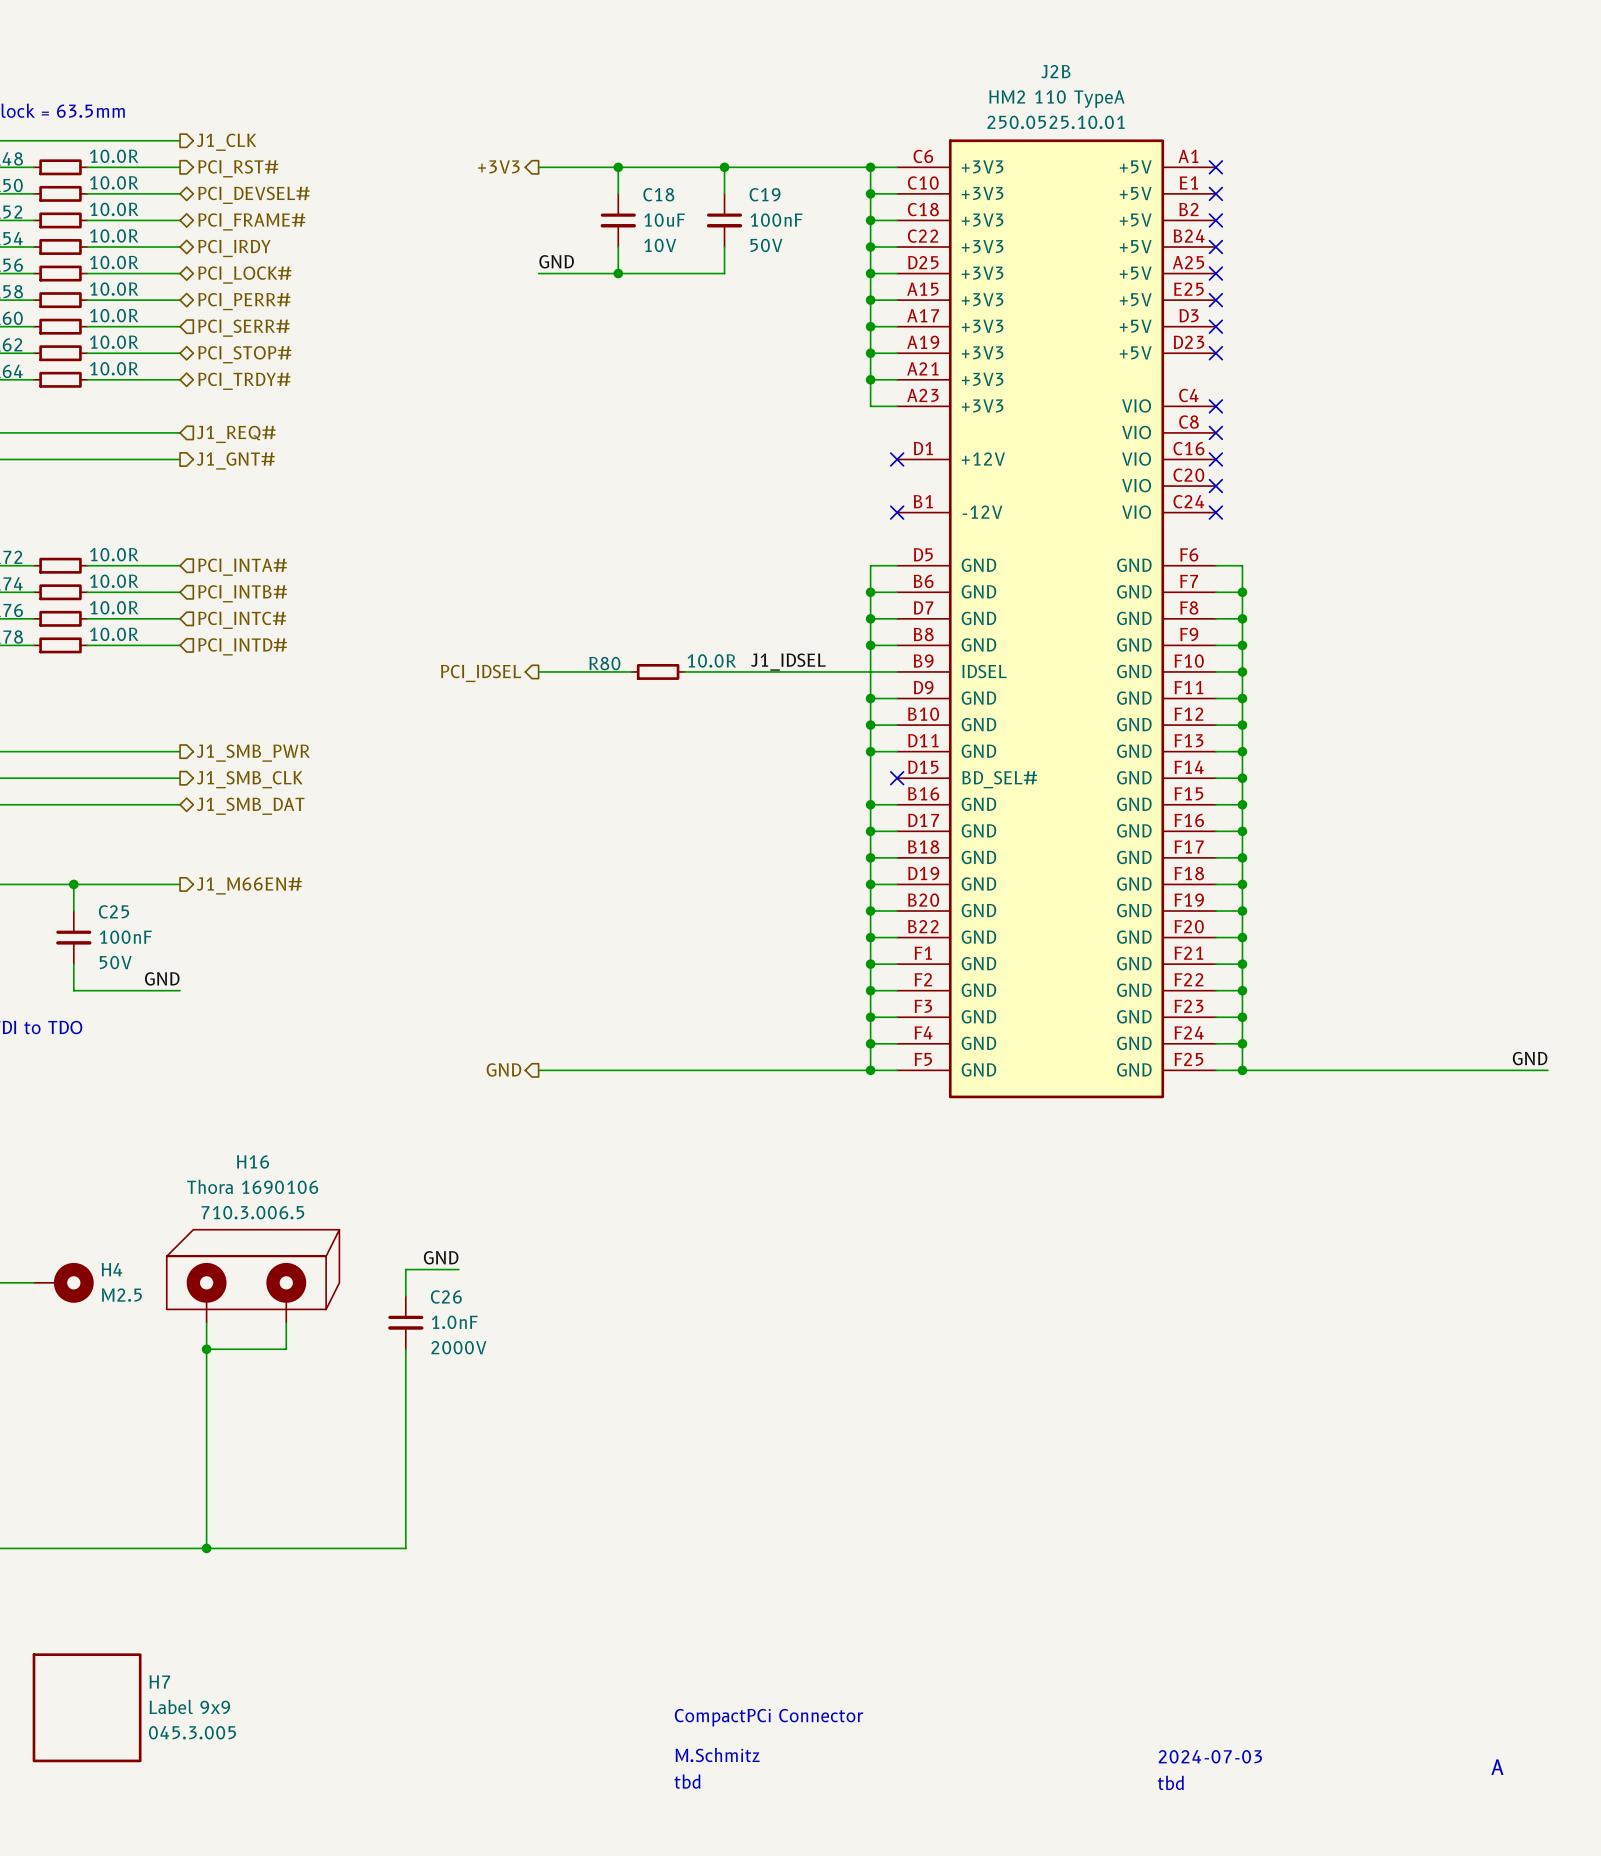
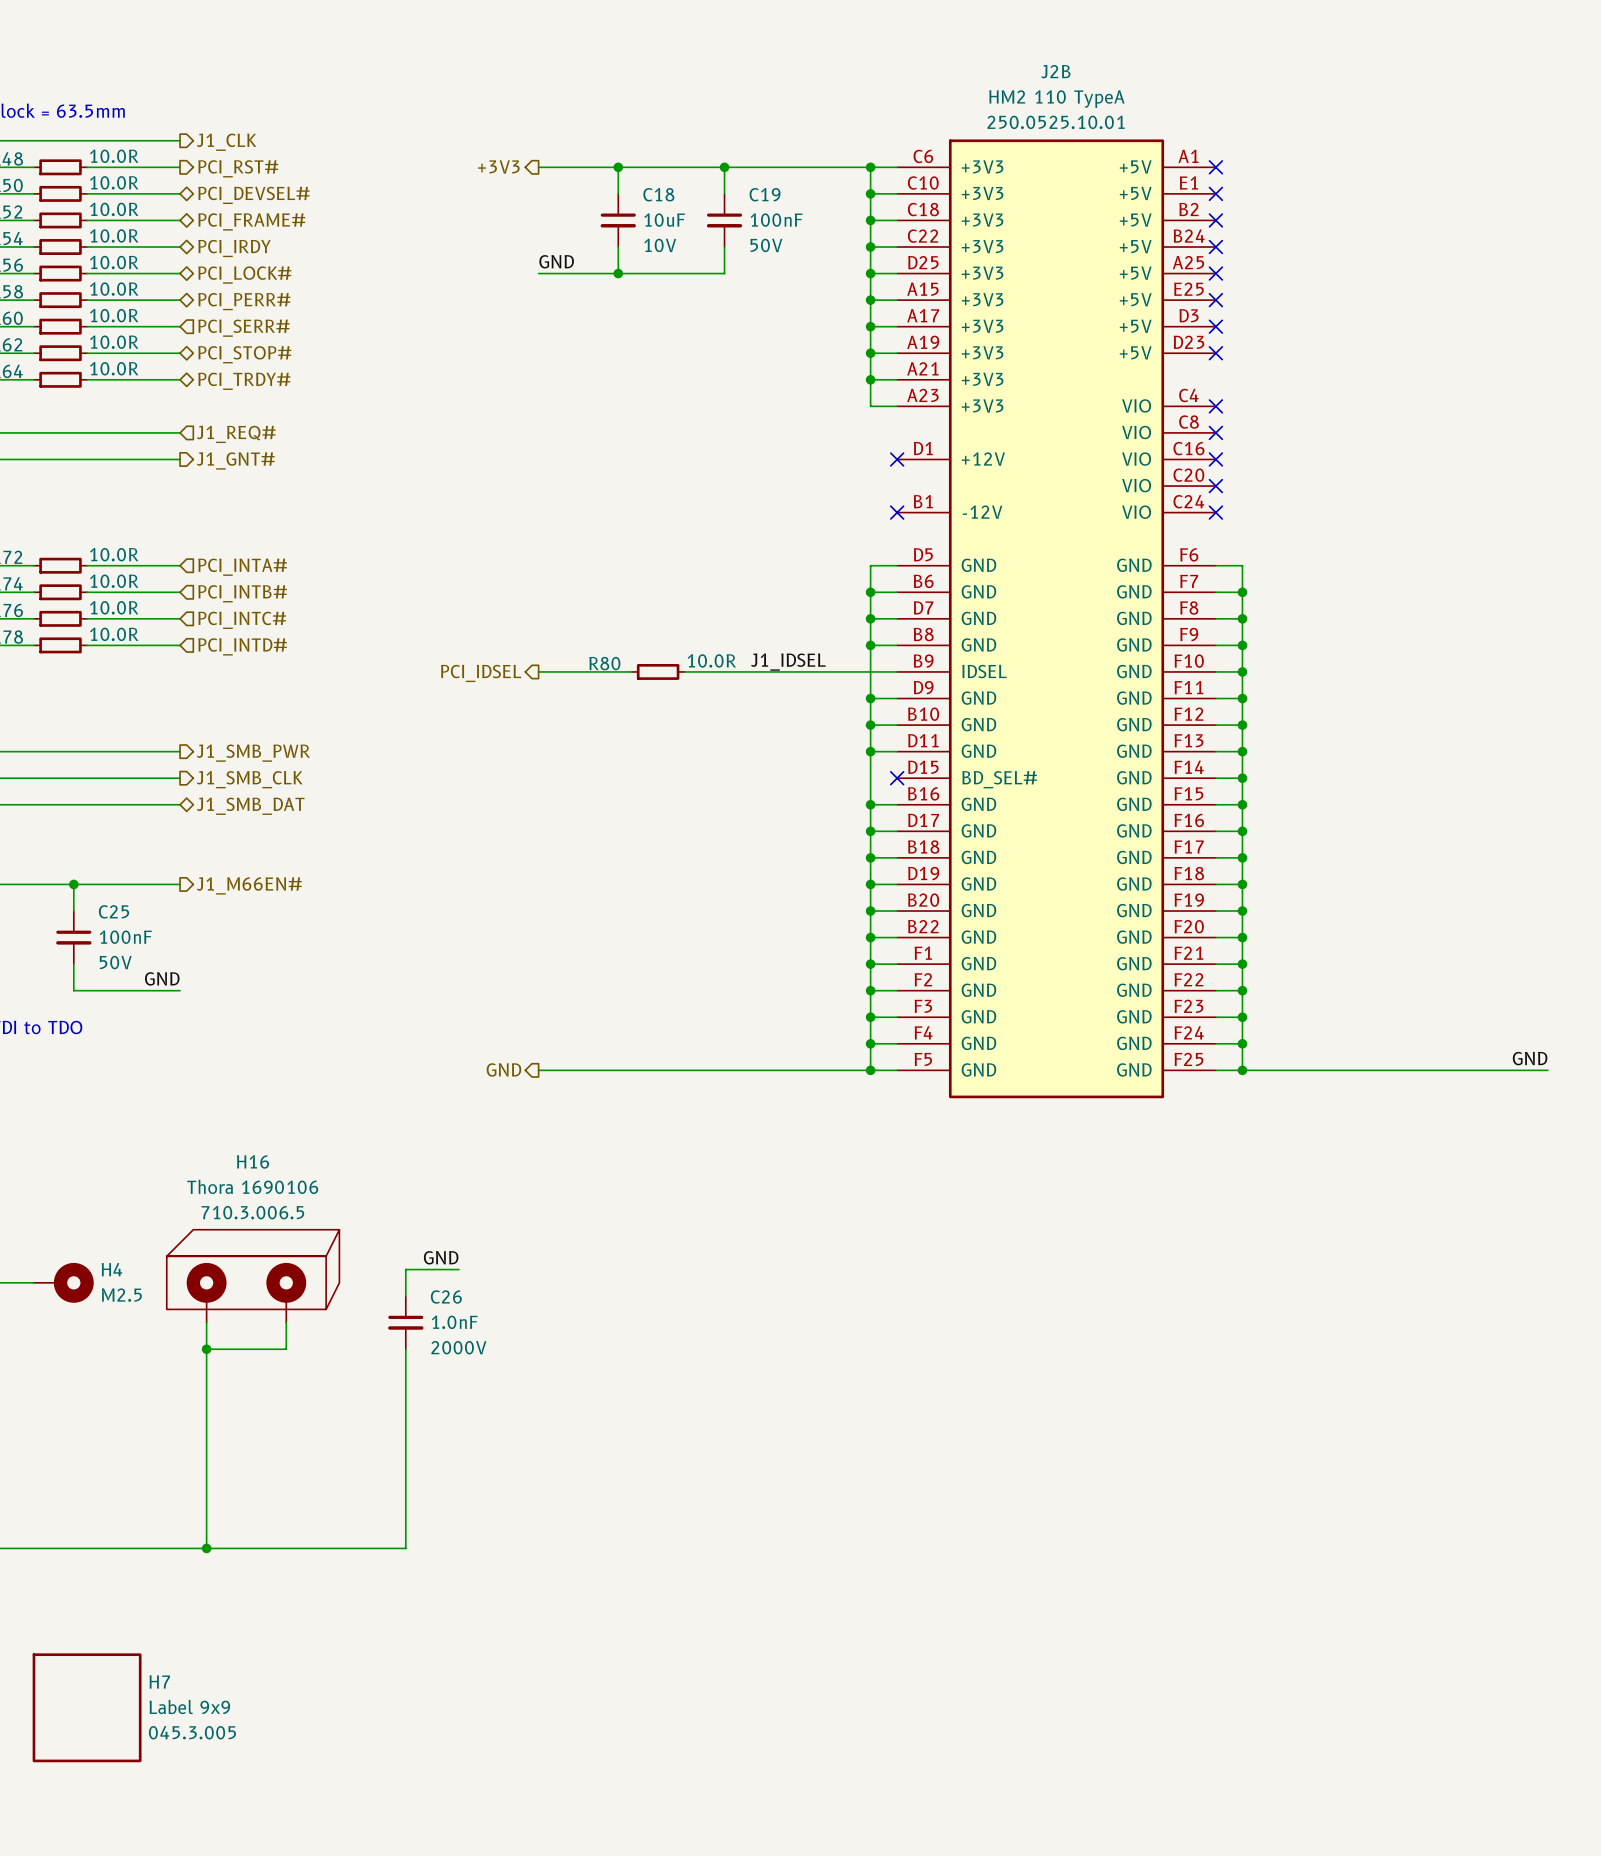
text: CompactPCi Connector (769, 1717) -> none
text: M.Schmitz (717, 1754) -> none
text: 2024-07-03 (1210, 1756) -> none
text: A (1497, 1767) -> none
text: tbd (687, 1781) -> none
text: tbd (1170, 1782) -> none

